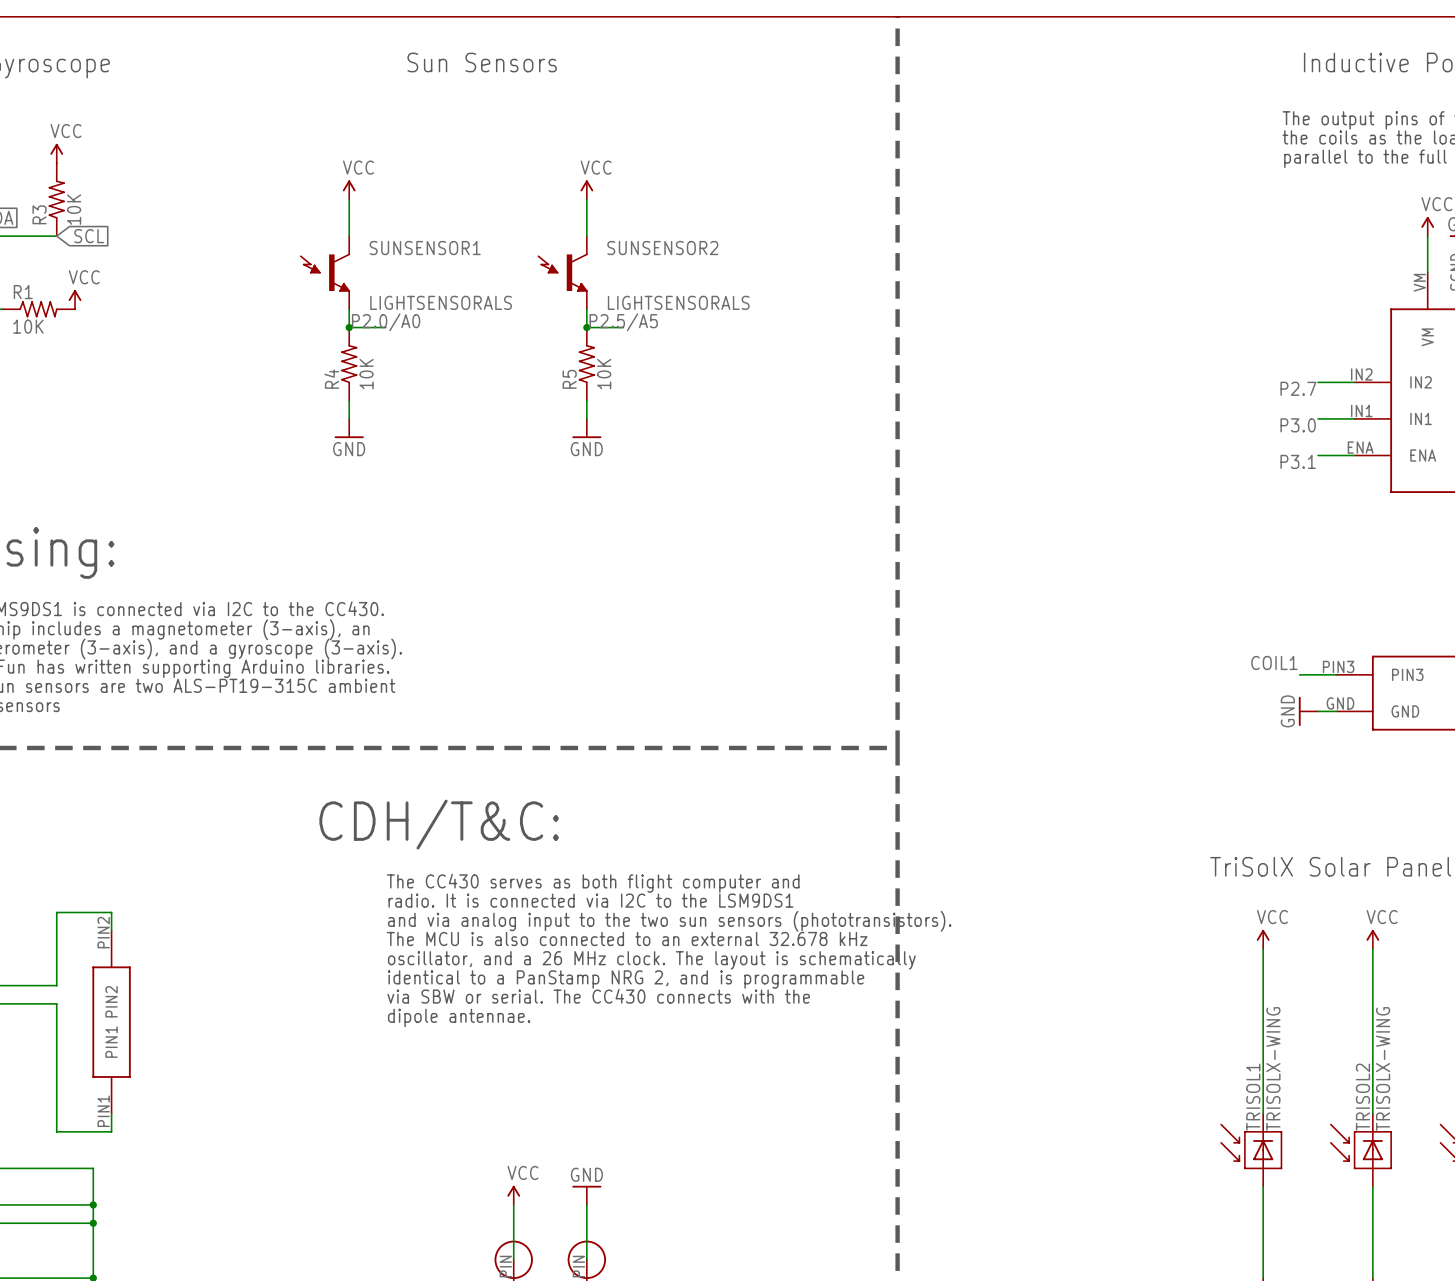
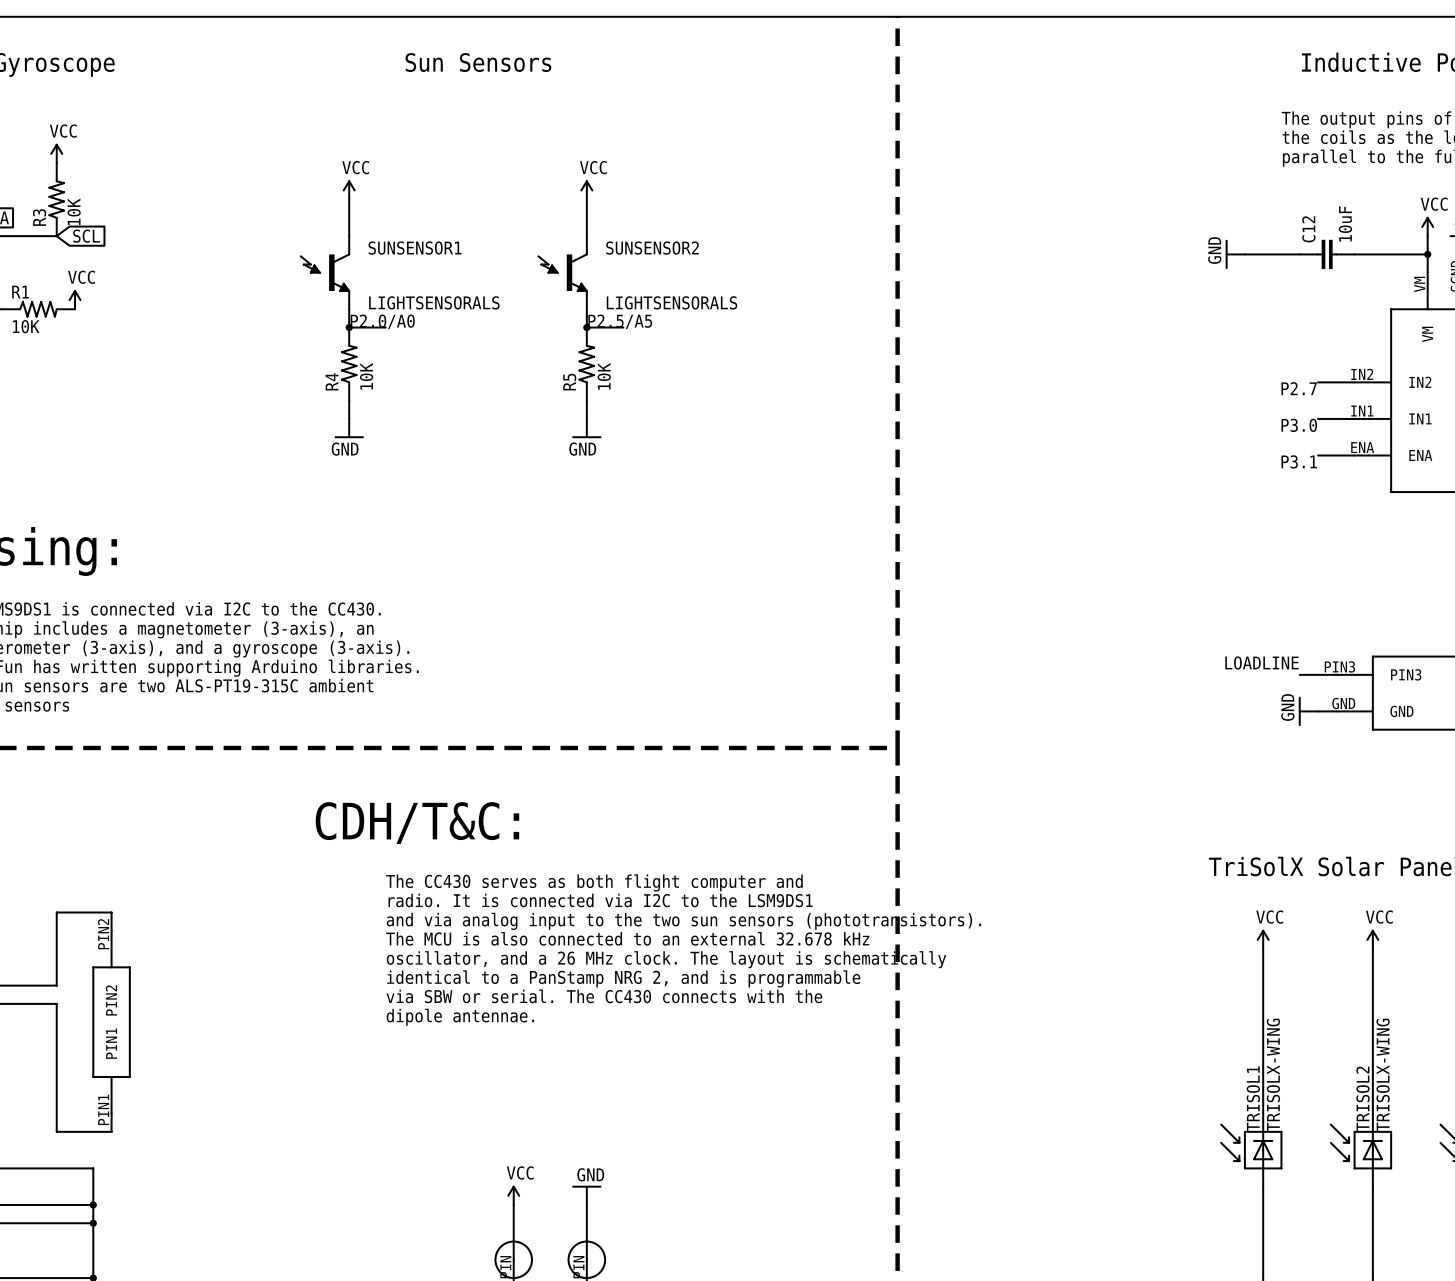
power symbol: none -> GND (1235, 254)
wire: none -> (1244, 254) (1299, 254)
C12: none -> 10uF (1327, 254)
wire: none -> (1354, 254) (1427, 254)
junction: none -> (1427, 254)
label: COIL1 (1274, 662) -> LOADLINE (1262, 662)

